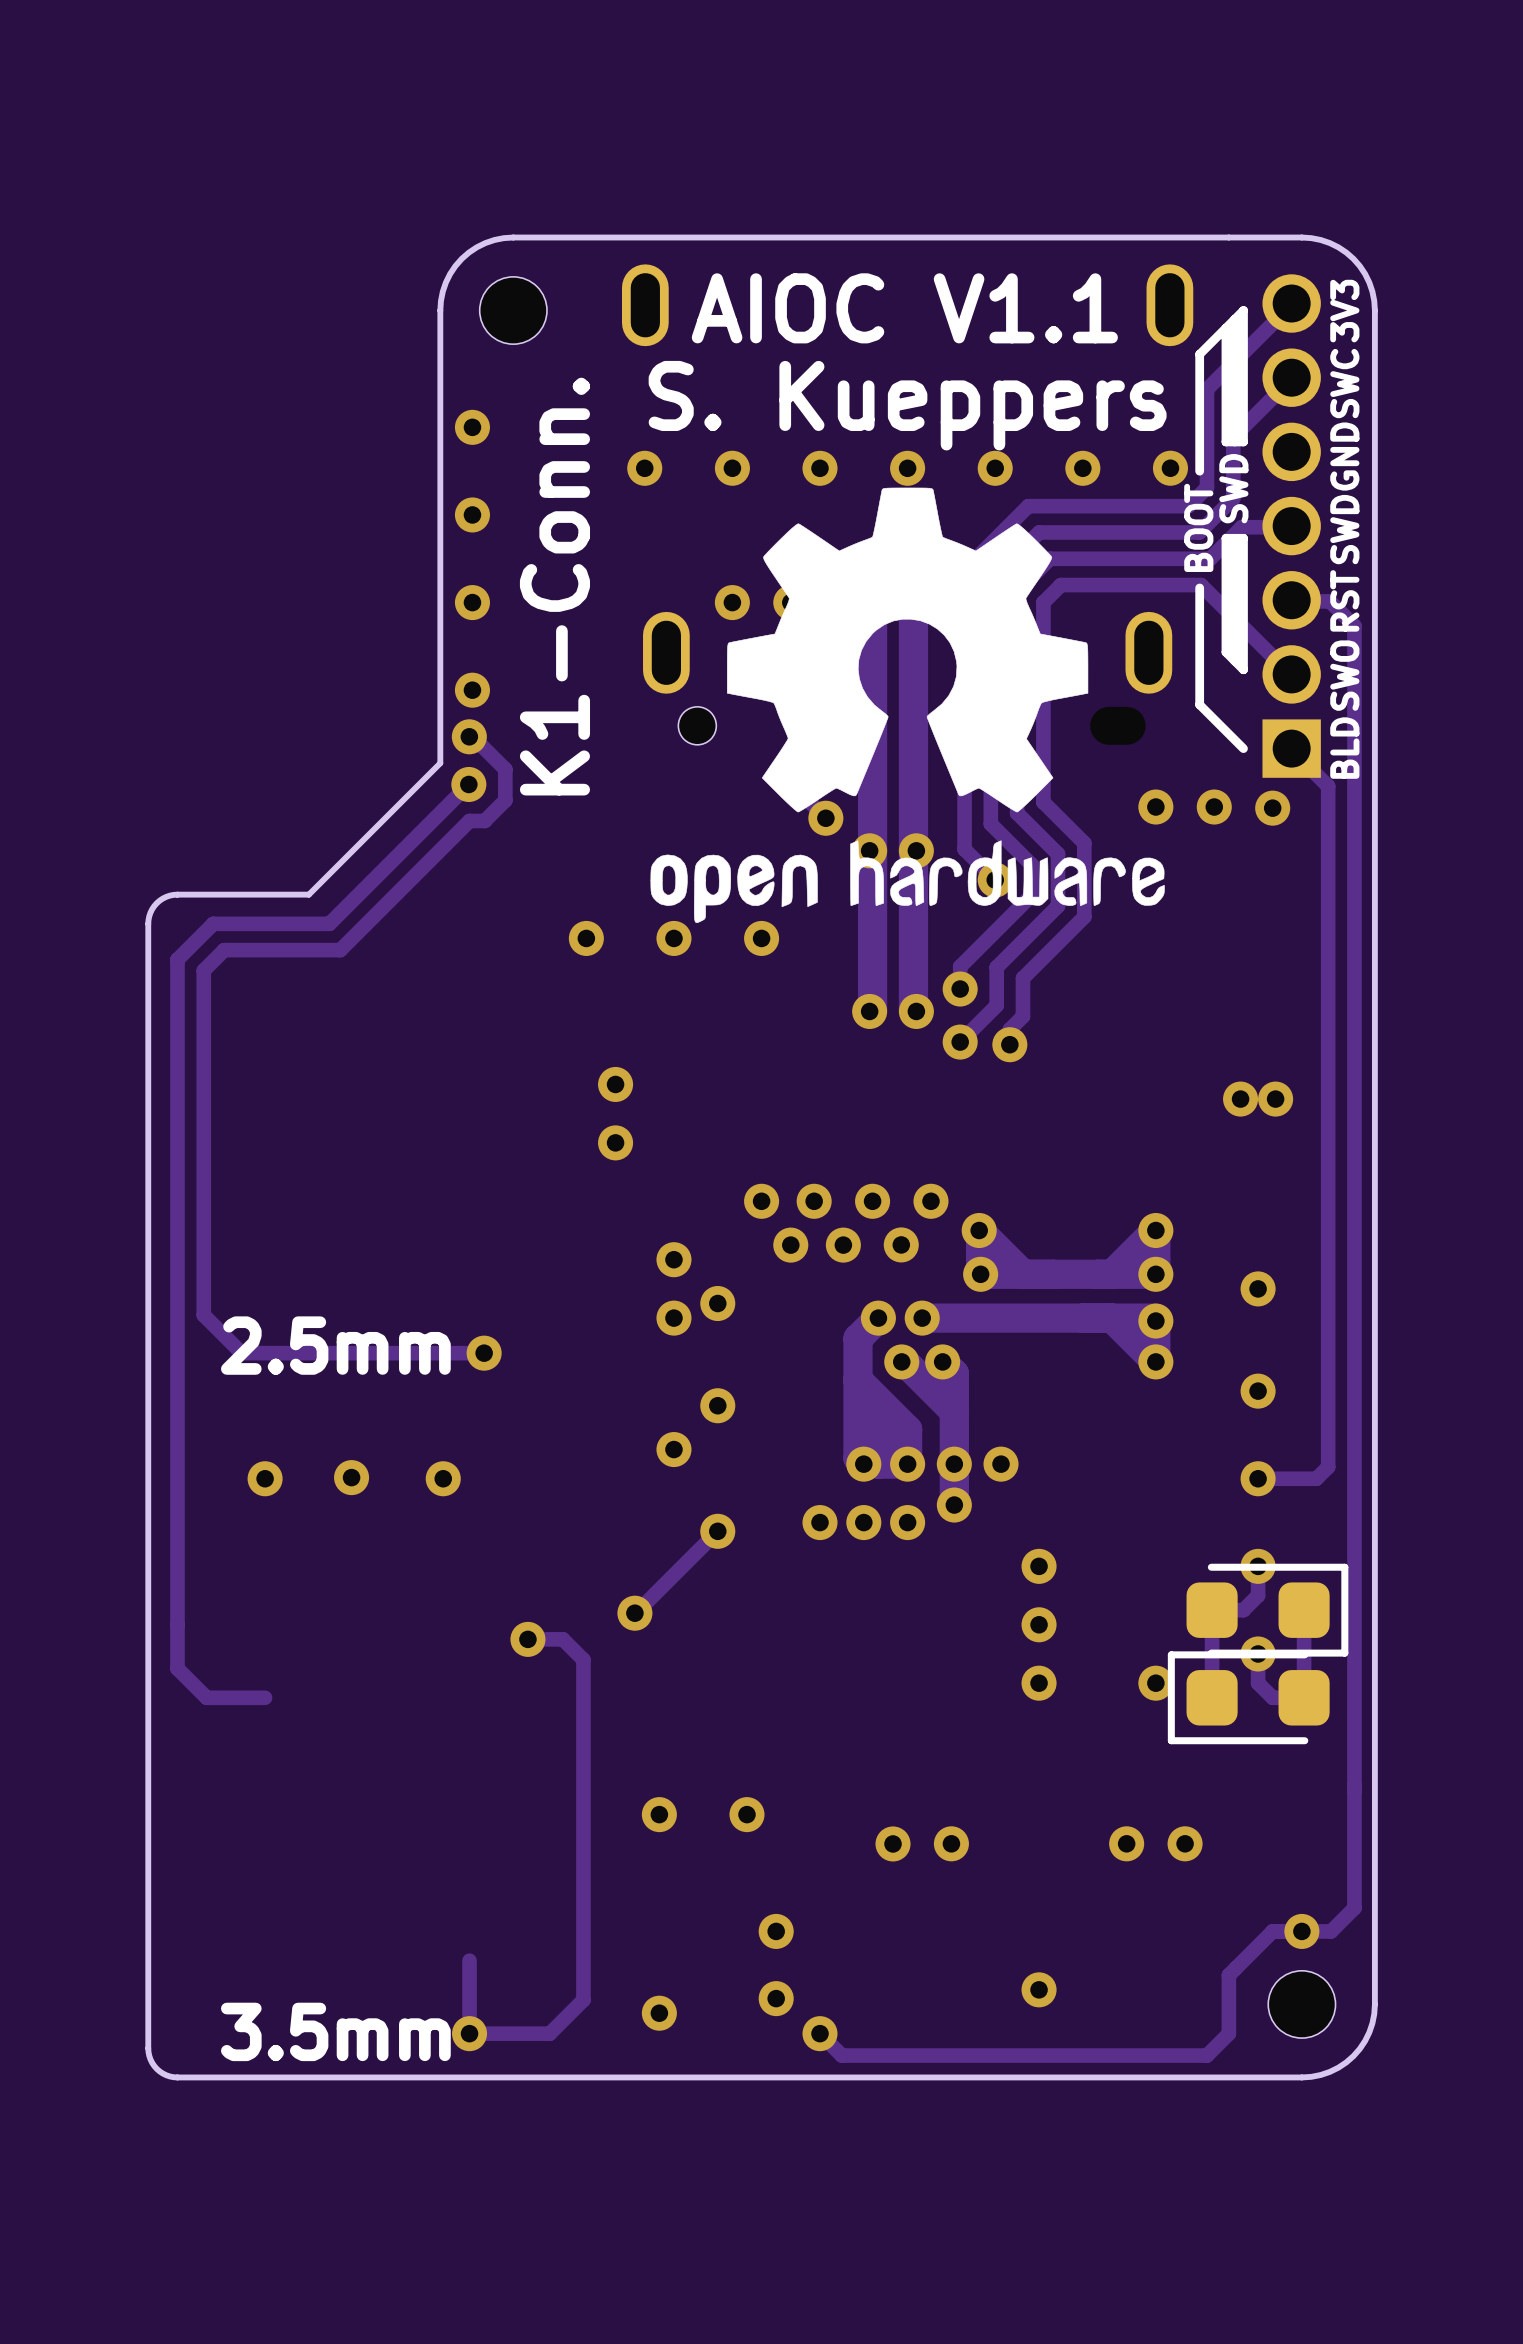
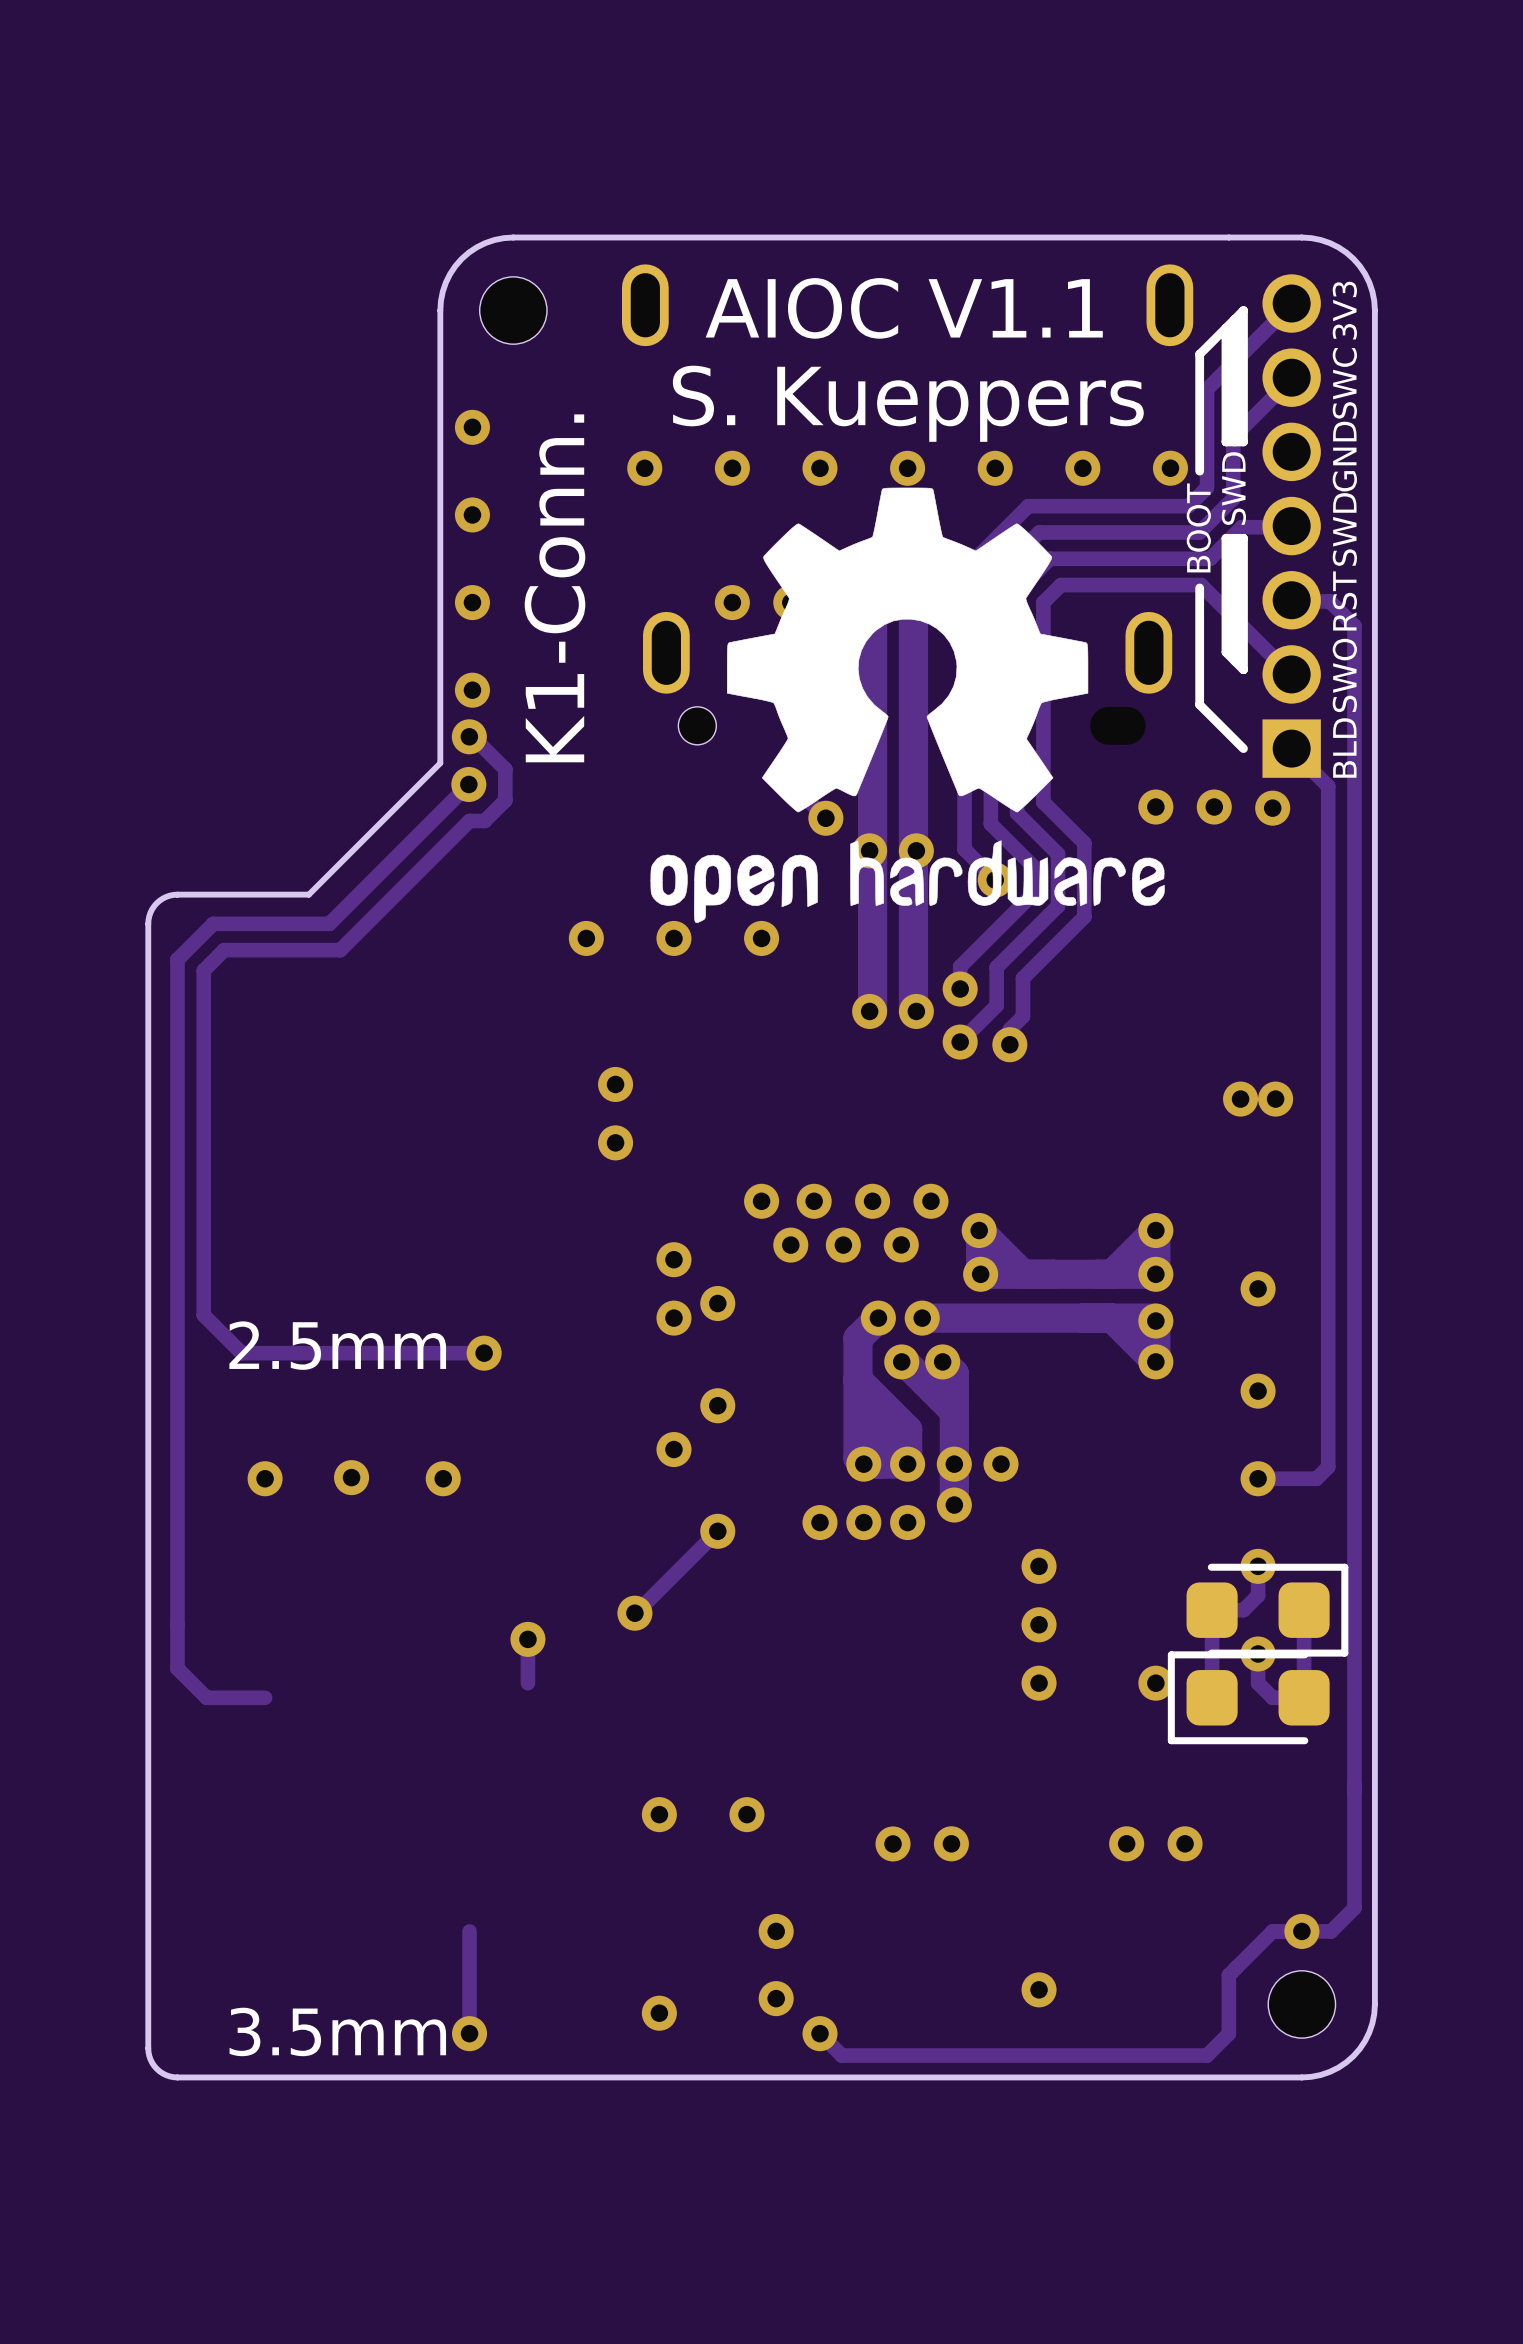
track: (527, 1639) (562, 1639) (583, 1659) (583, 2000) (549, 2033) (469, 2033) -> (527, 1639) (527, 1683)
track: none -> (469, 1931) (469, 1960)

